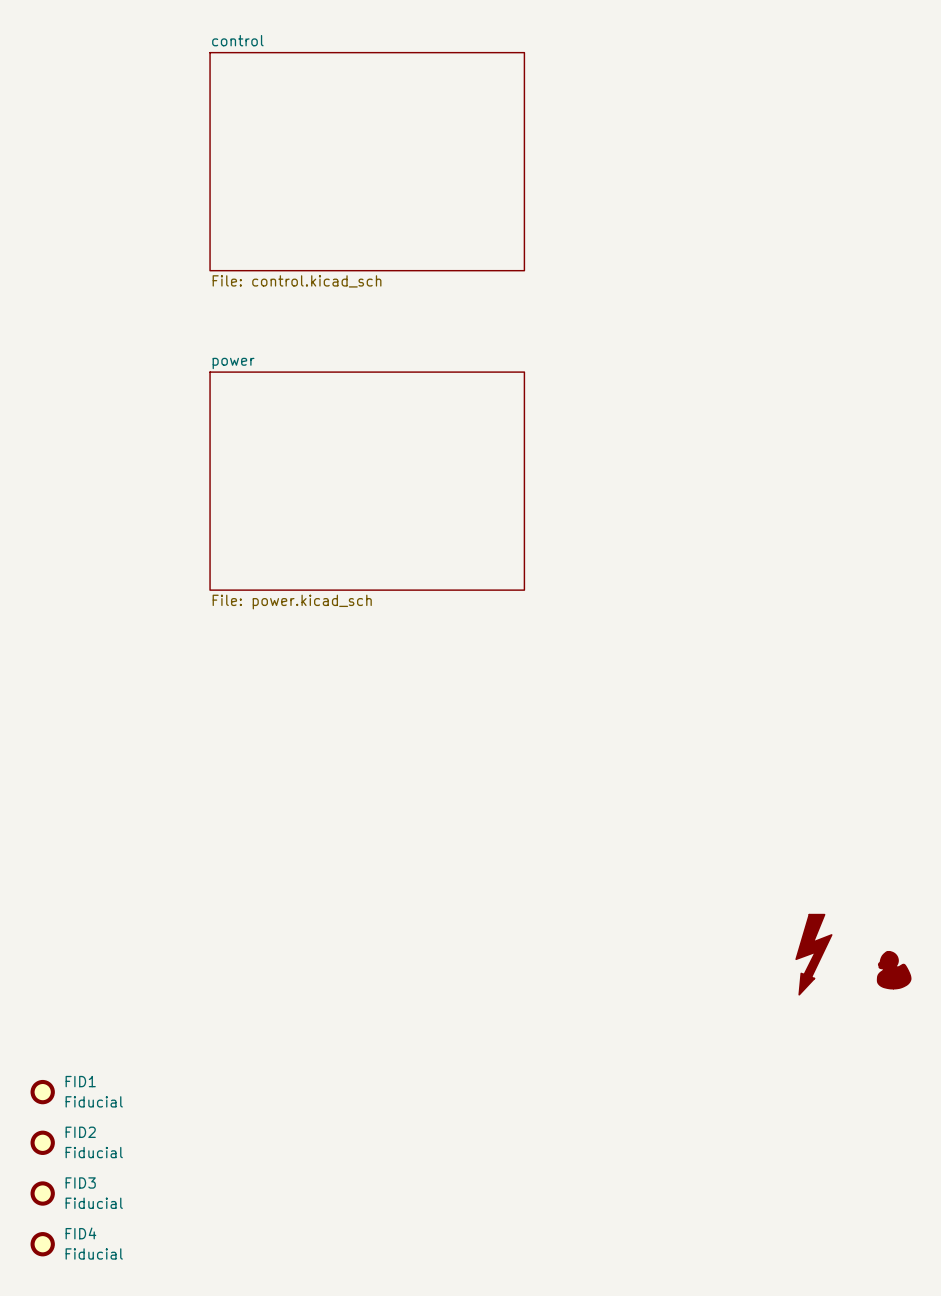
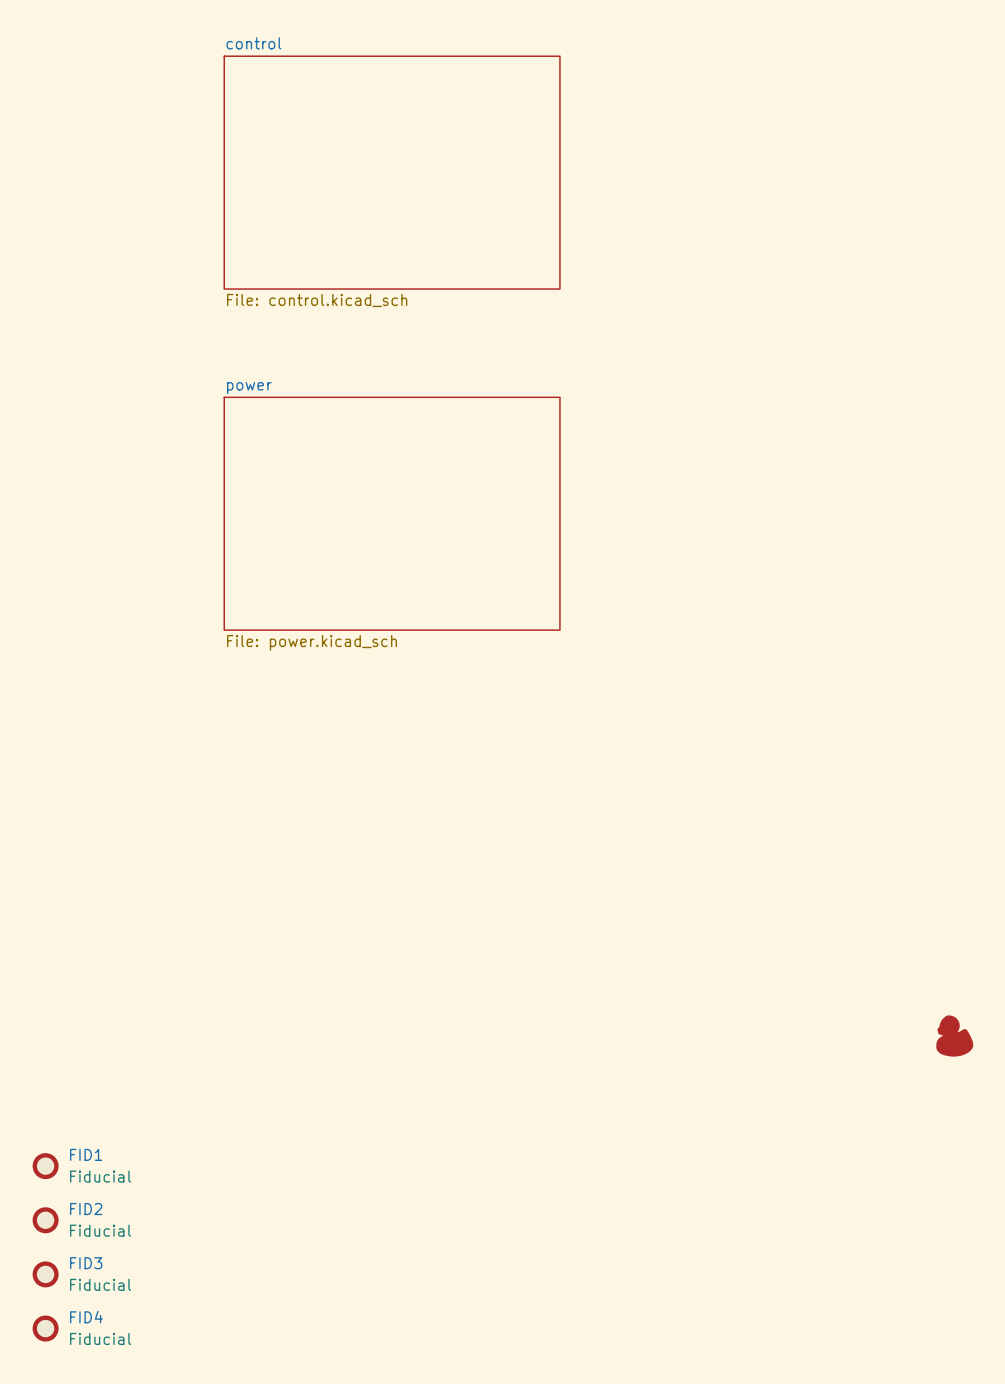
power symbol: (813, 954) -> none

